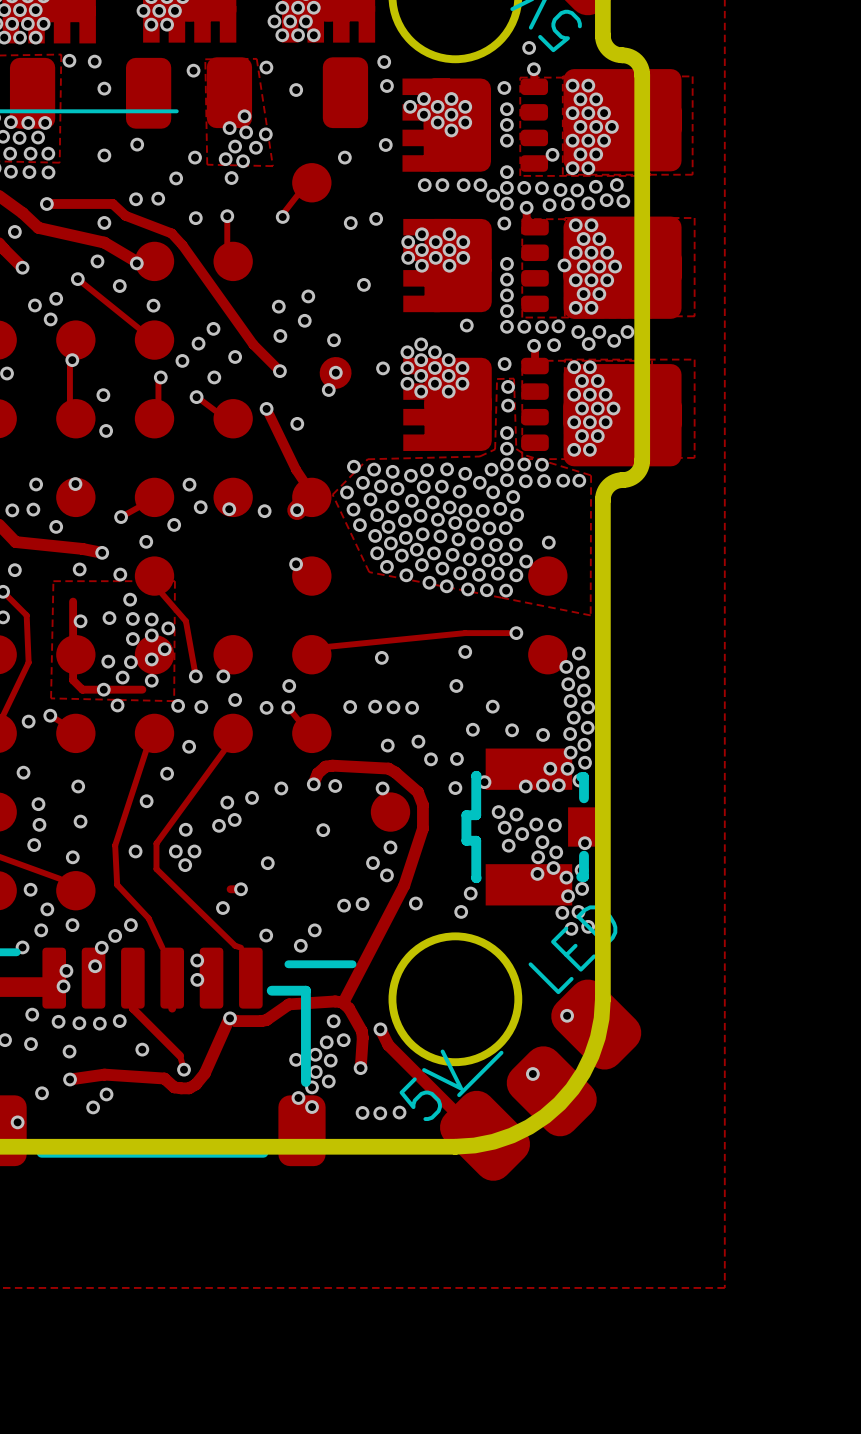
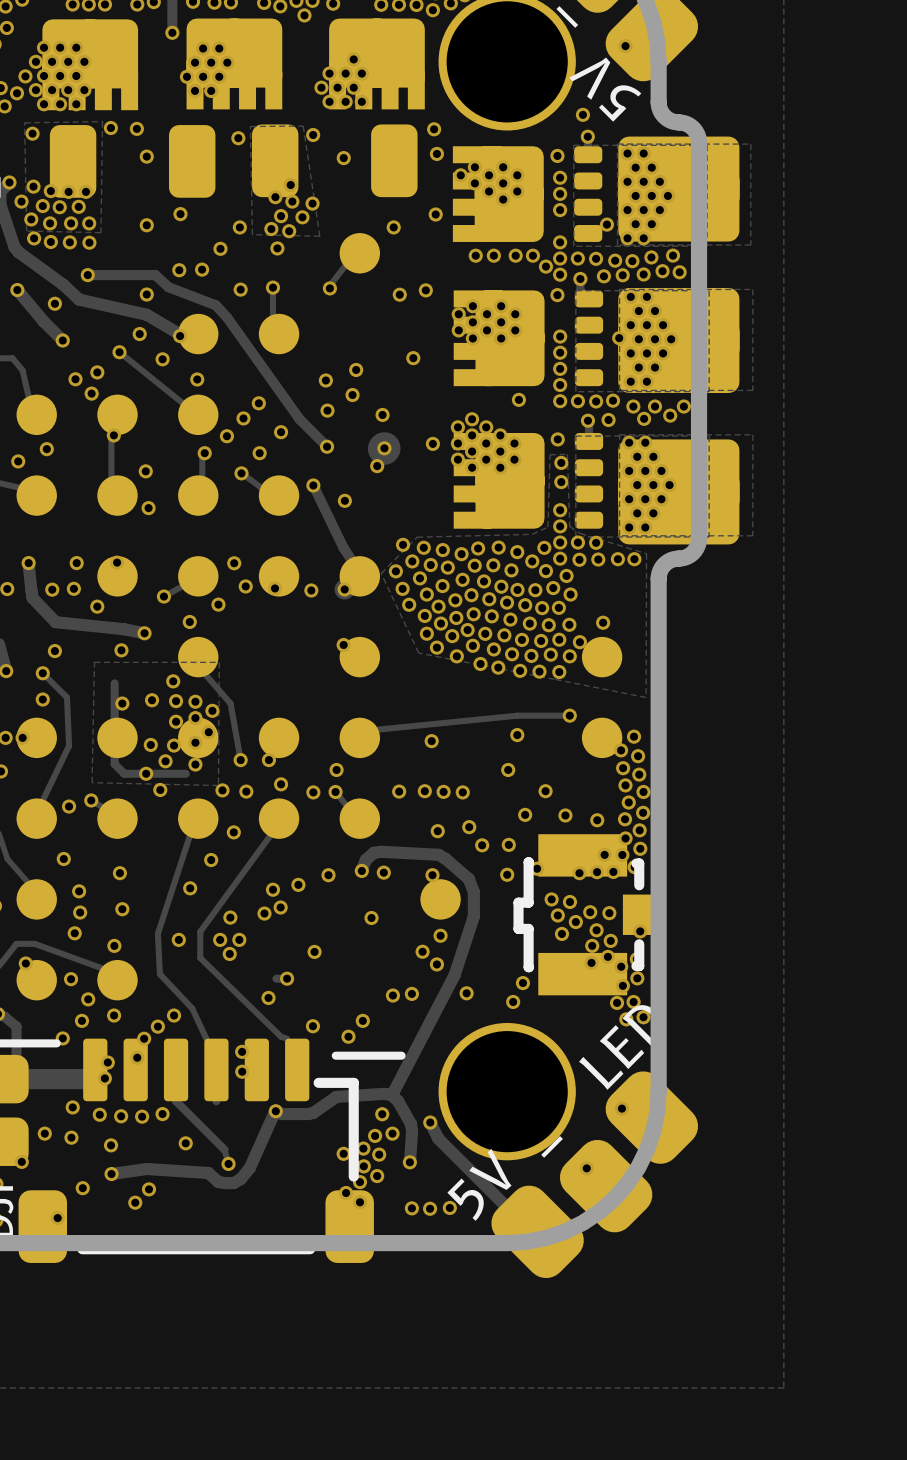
via: (120, 574) -> none

